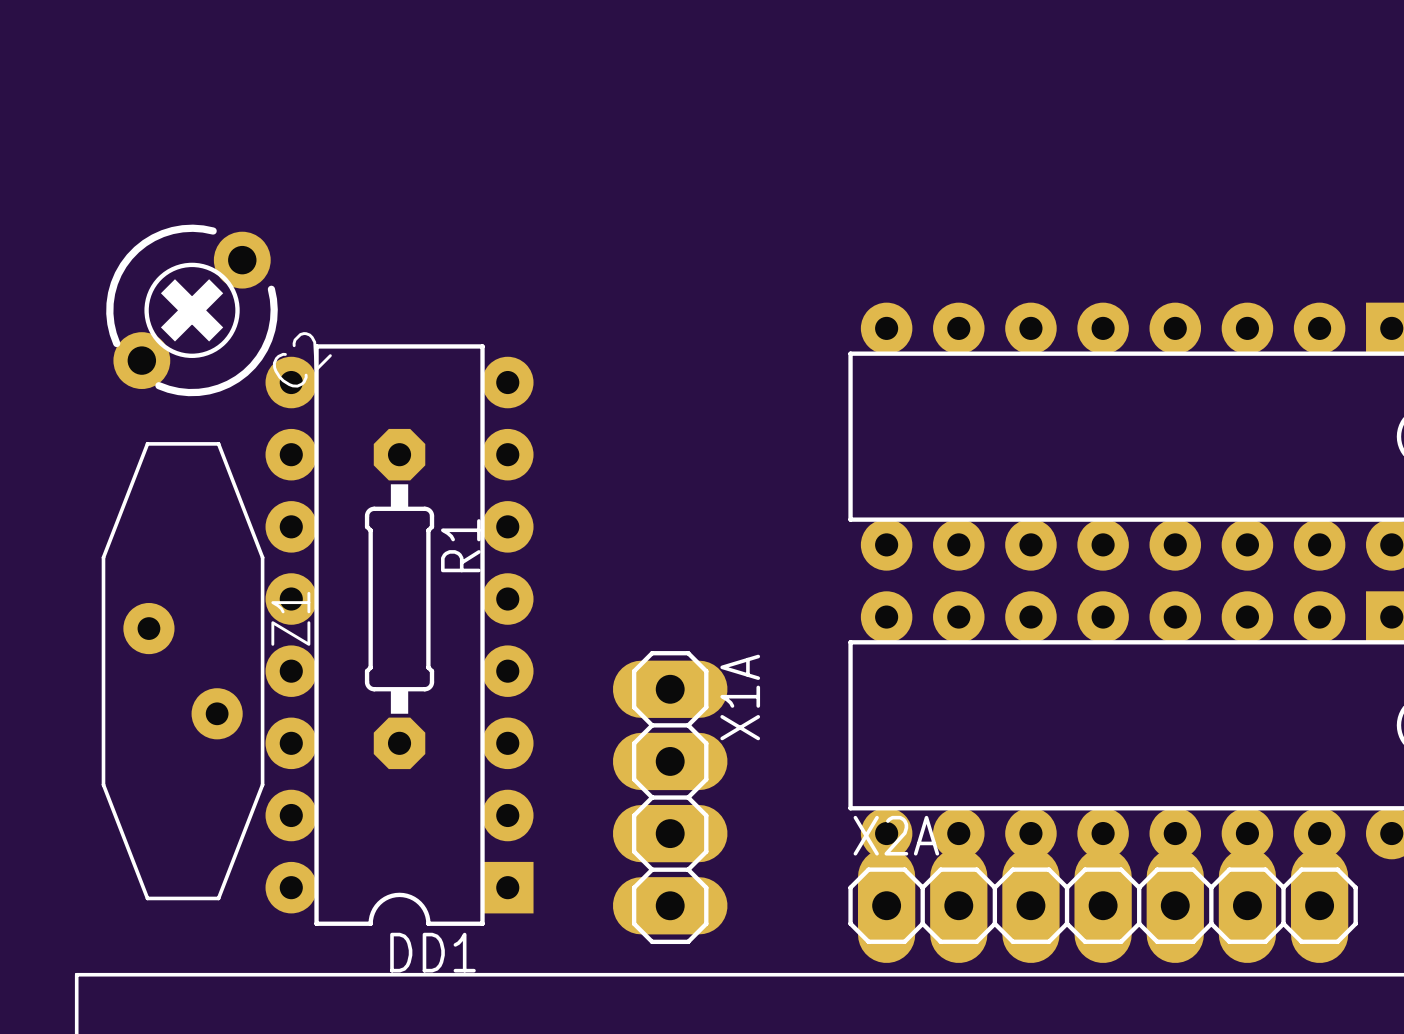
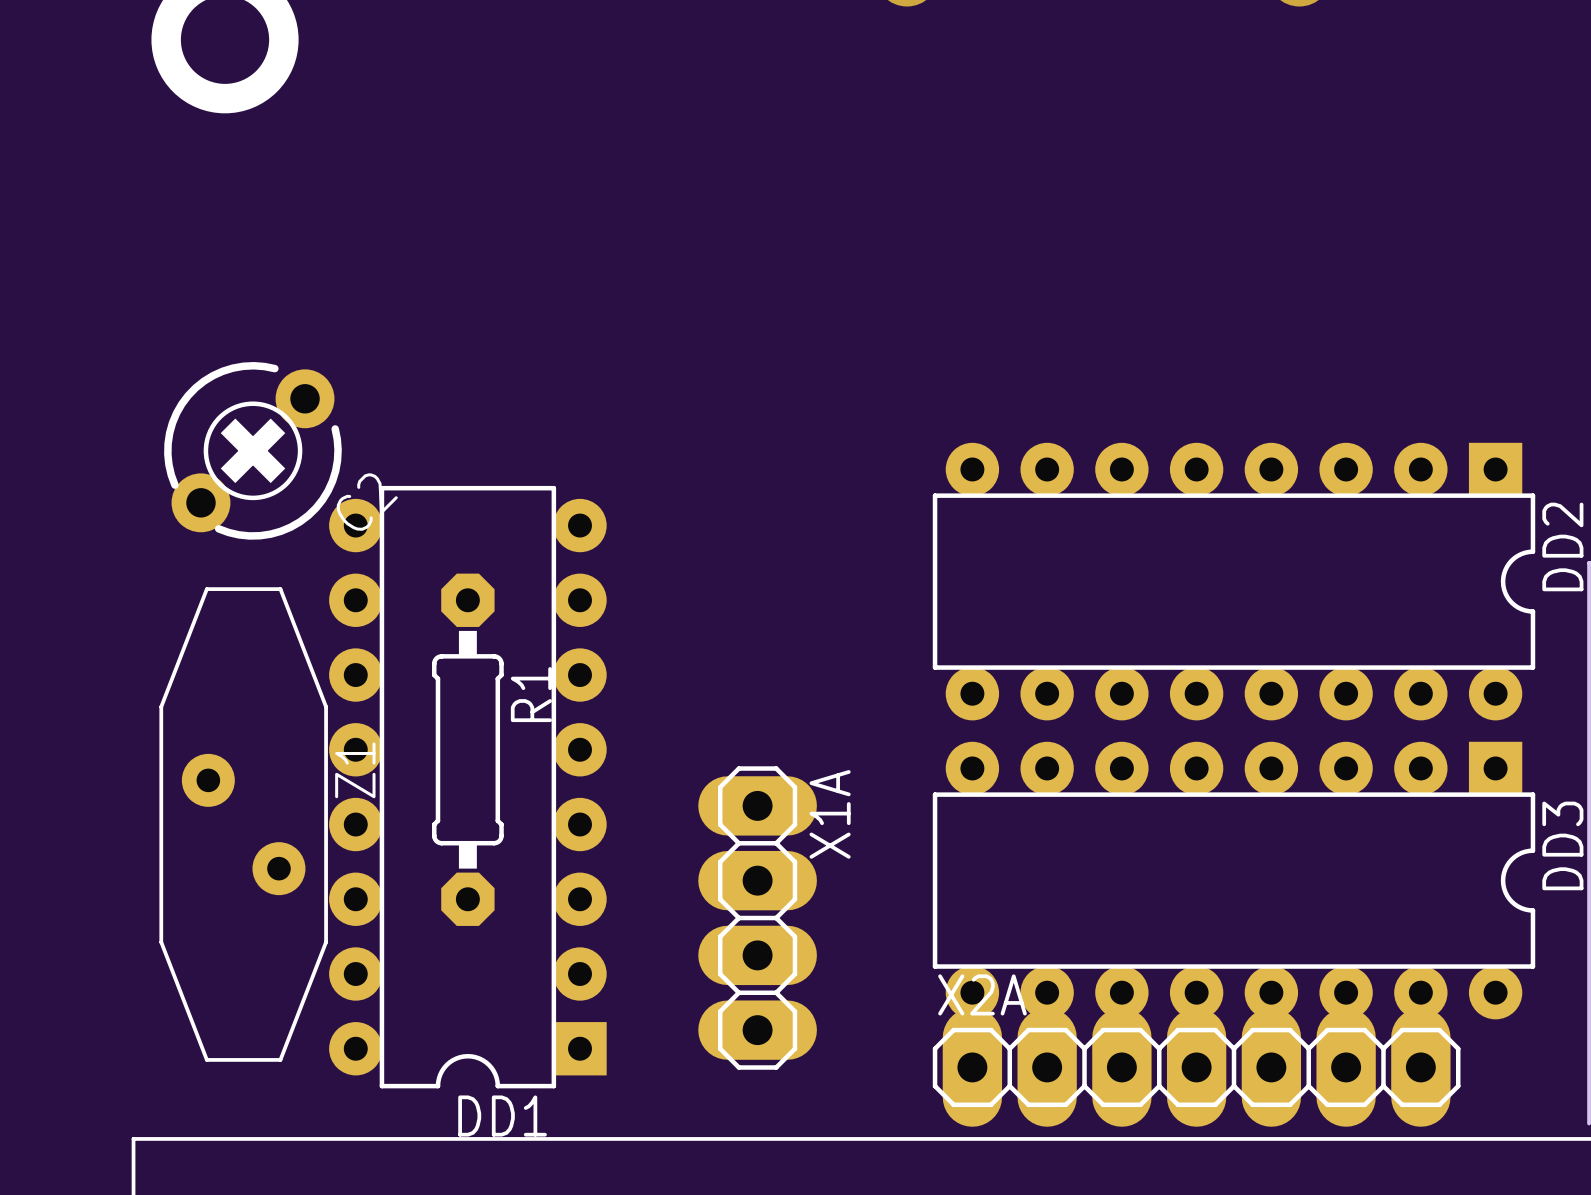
X1A position: (670, 797) -> (757, 918)

